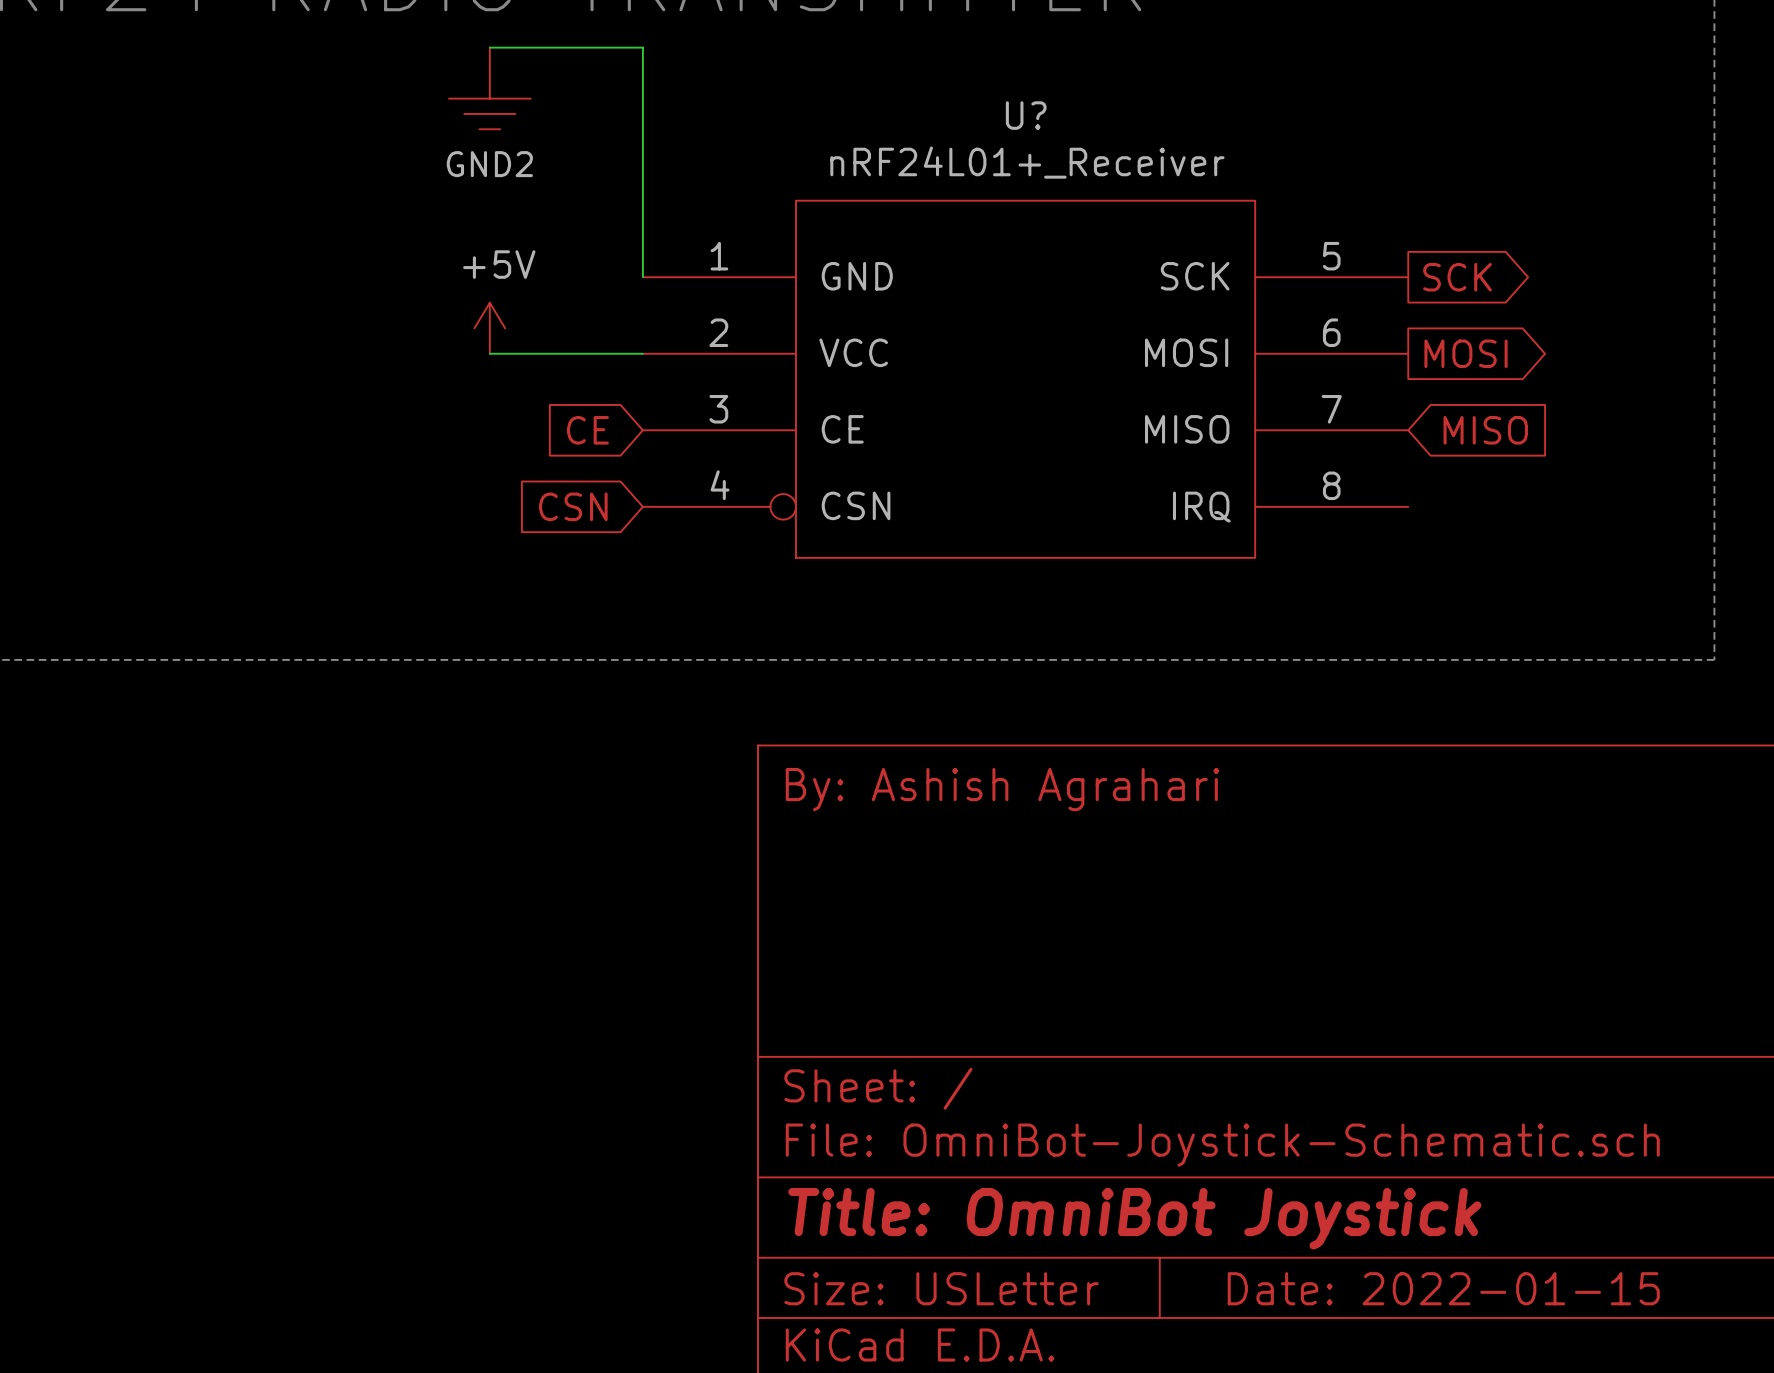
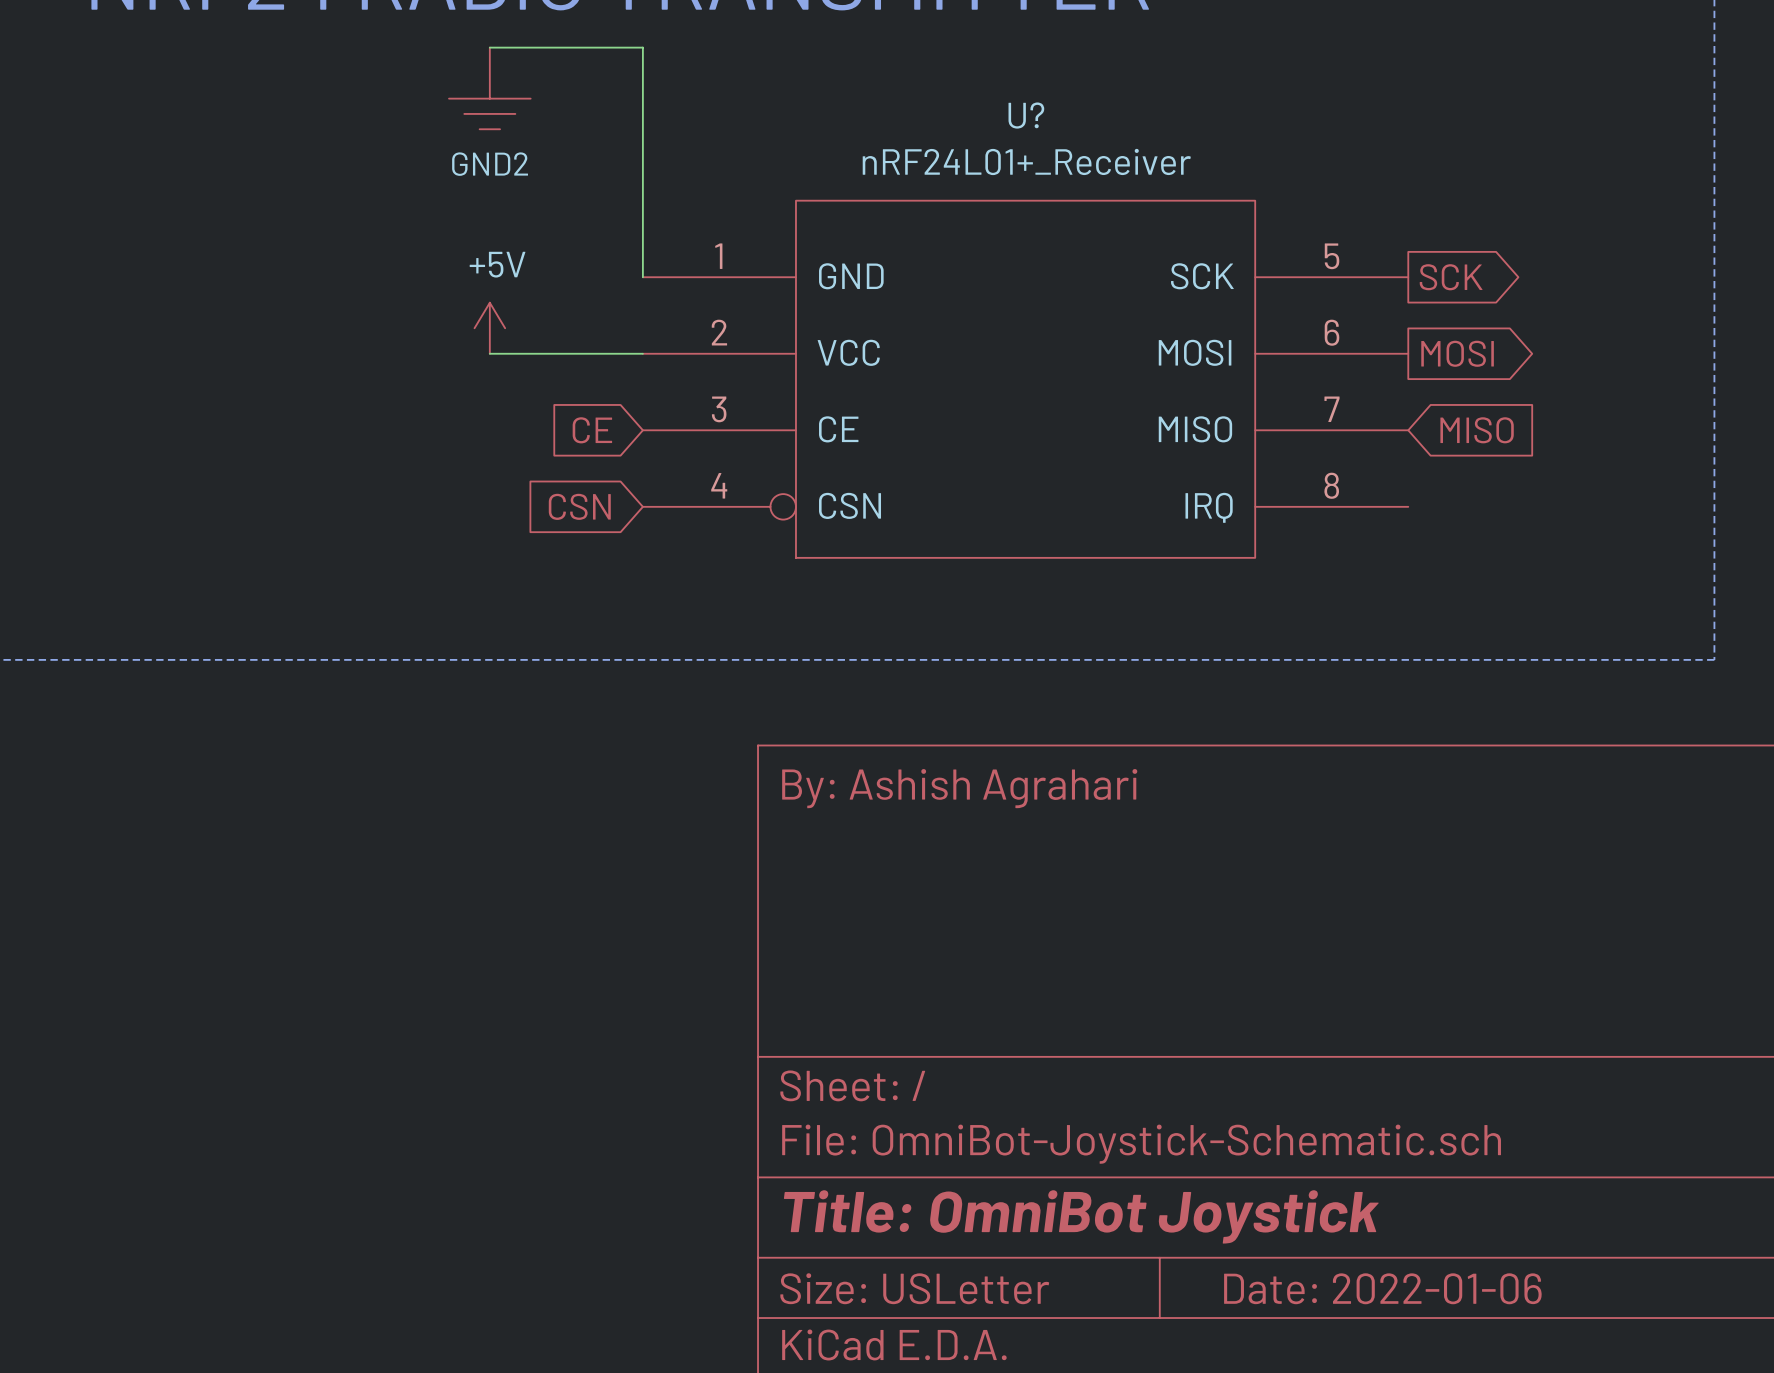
title block: Date: 2022-01-15 (1443, 1288) -> Date: 2022-01-06 (1382, 1288)

